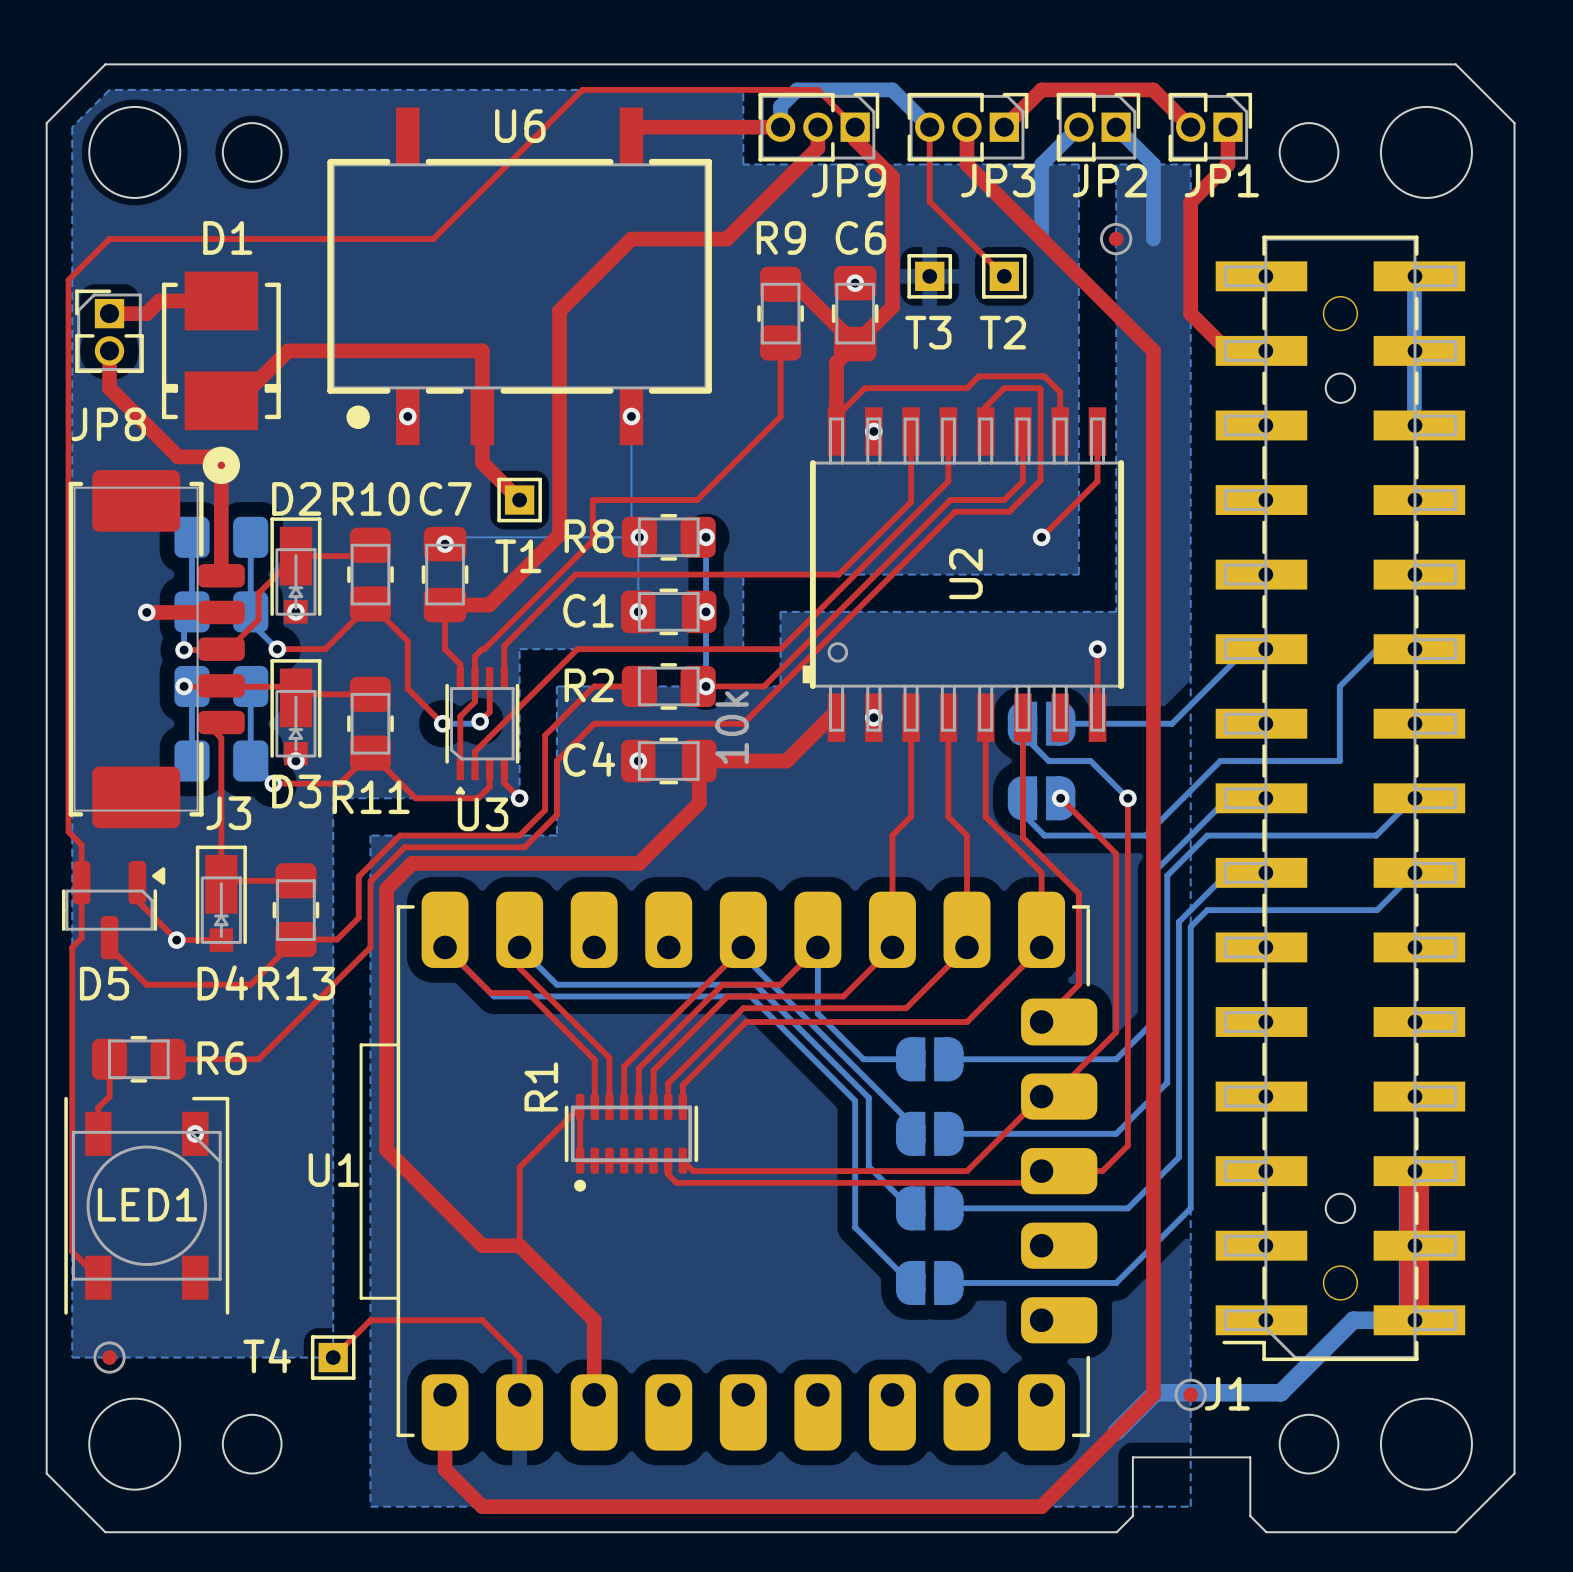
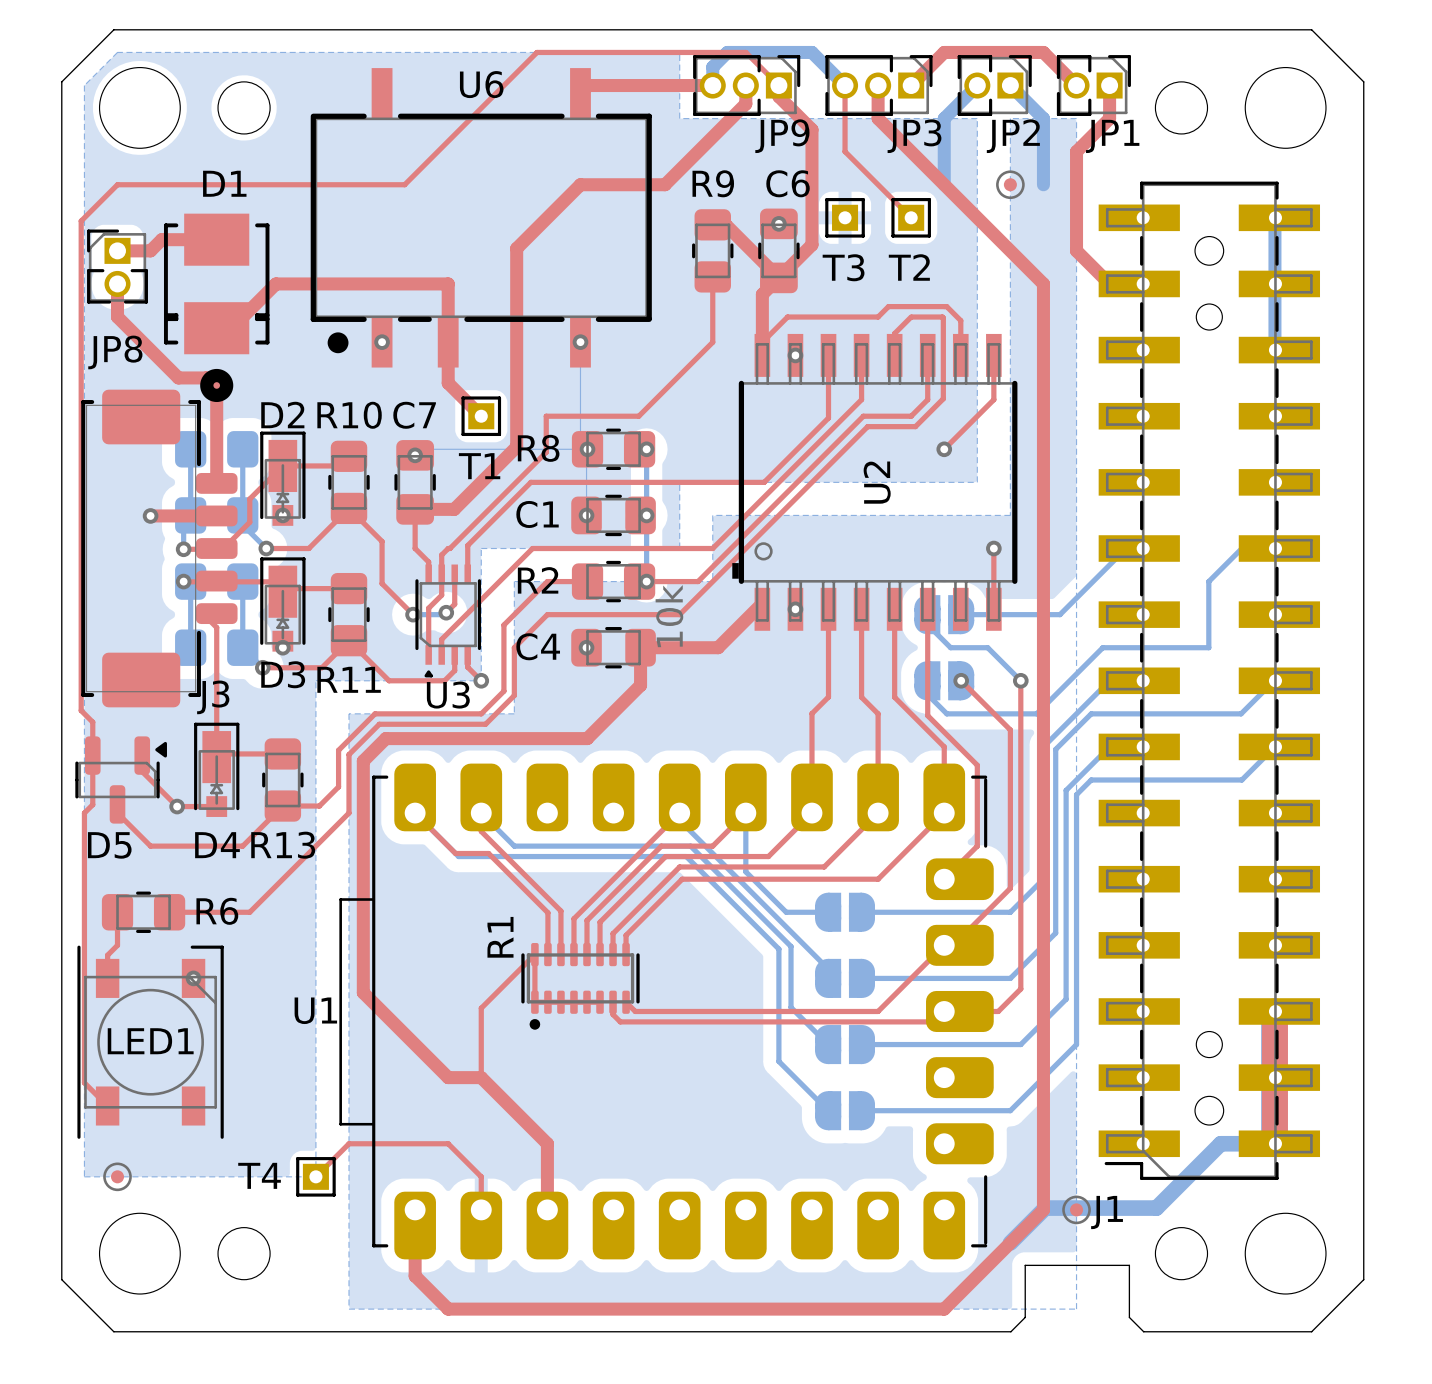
J1 footprint: [1215, 235, 1466, 1362] -> [1098, 181, 1321, 1180]

